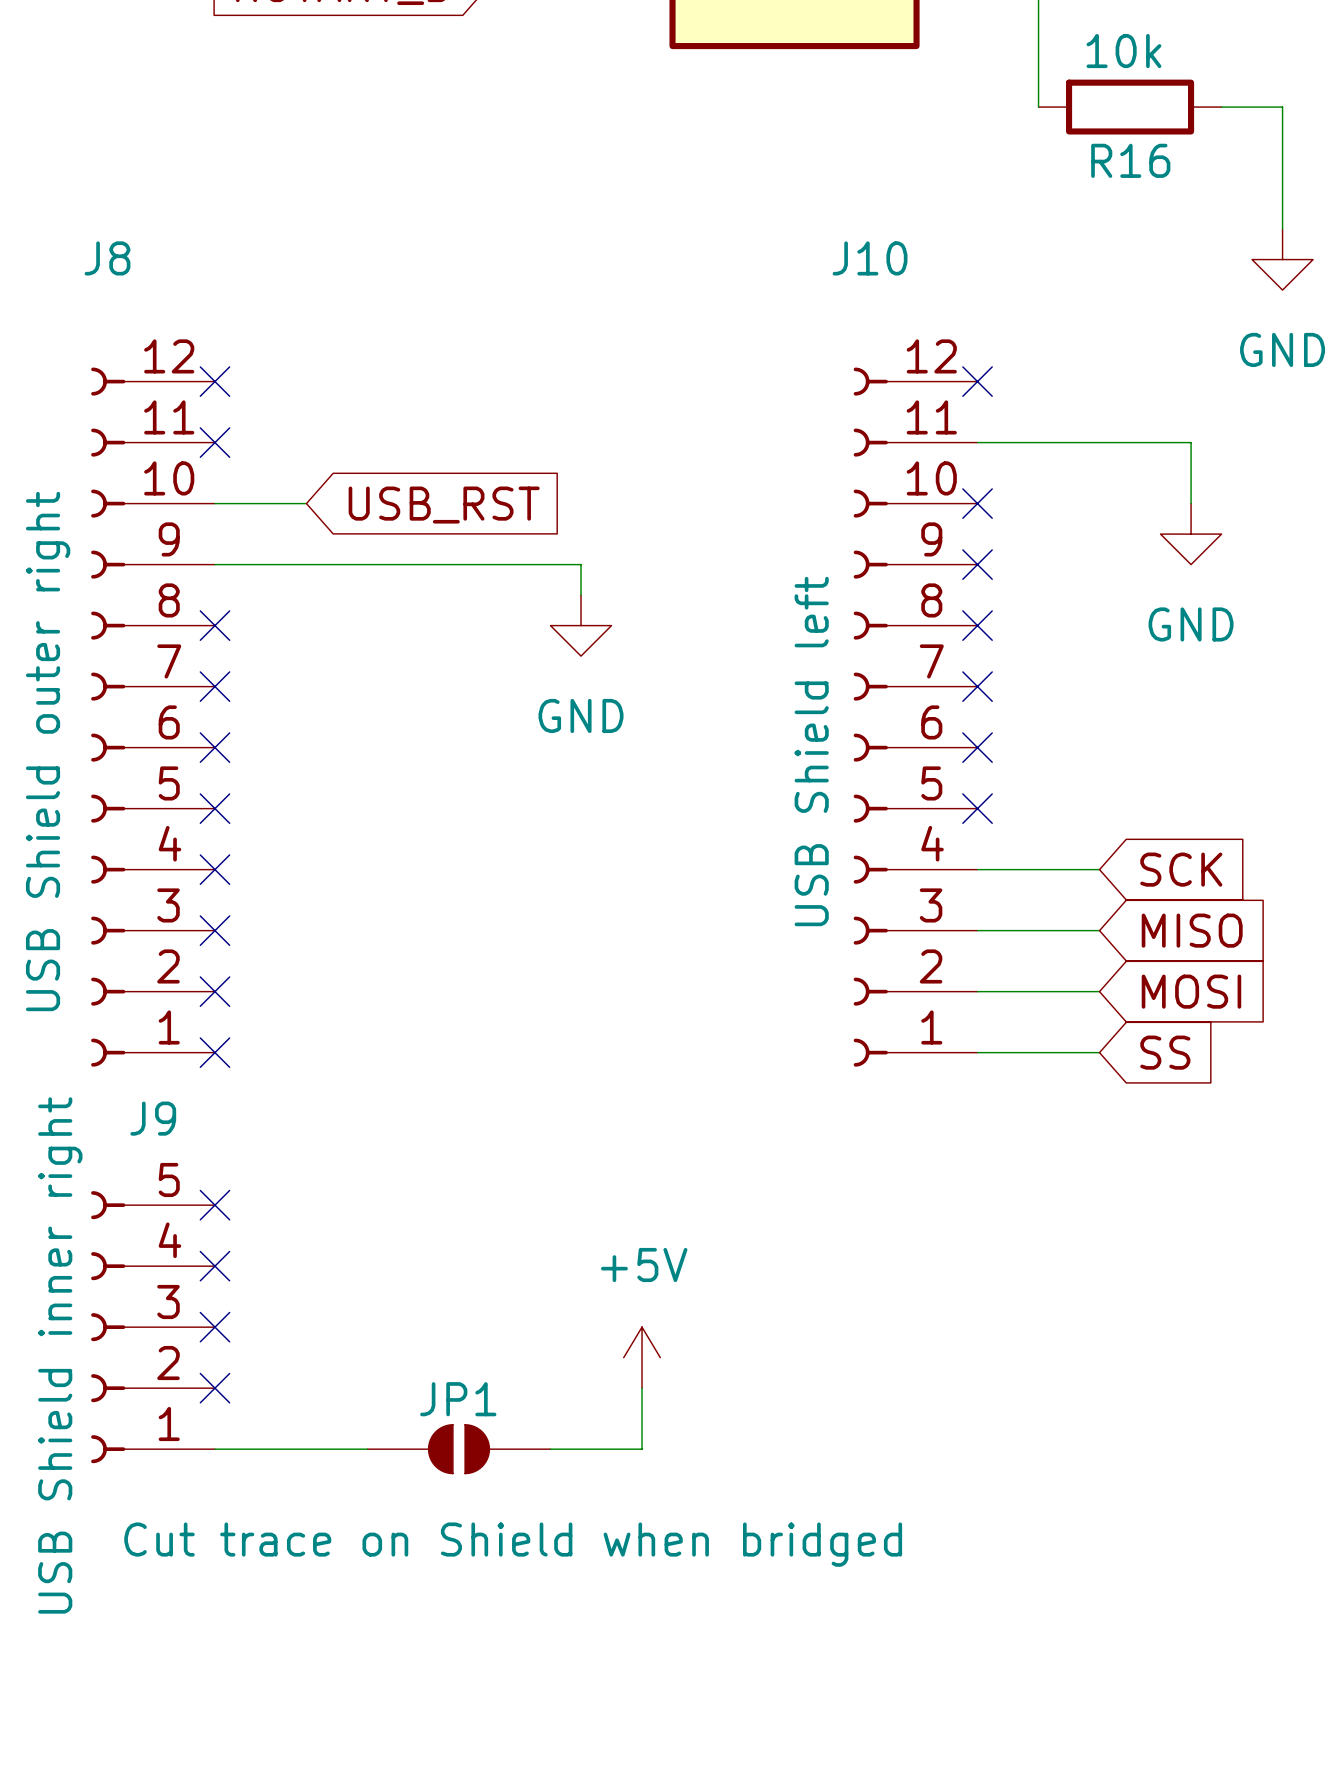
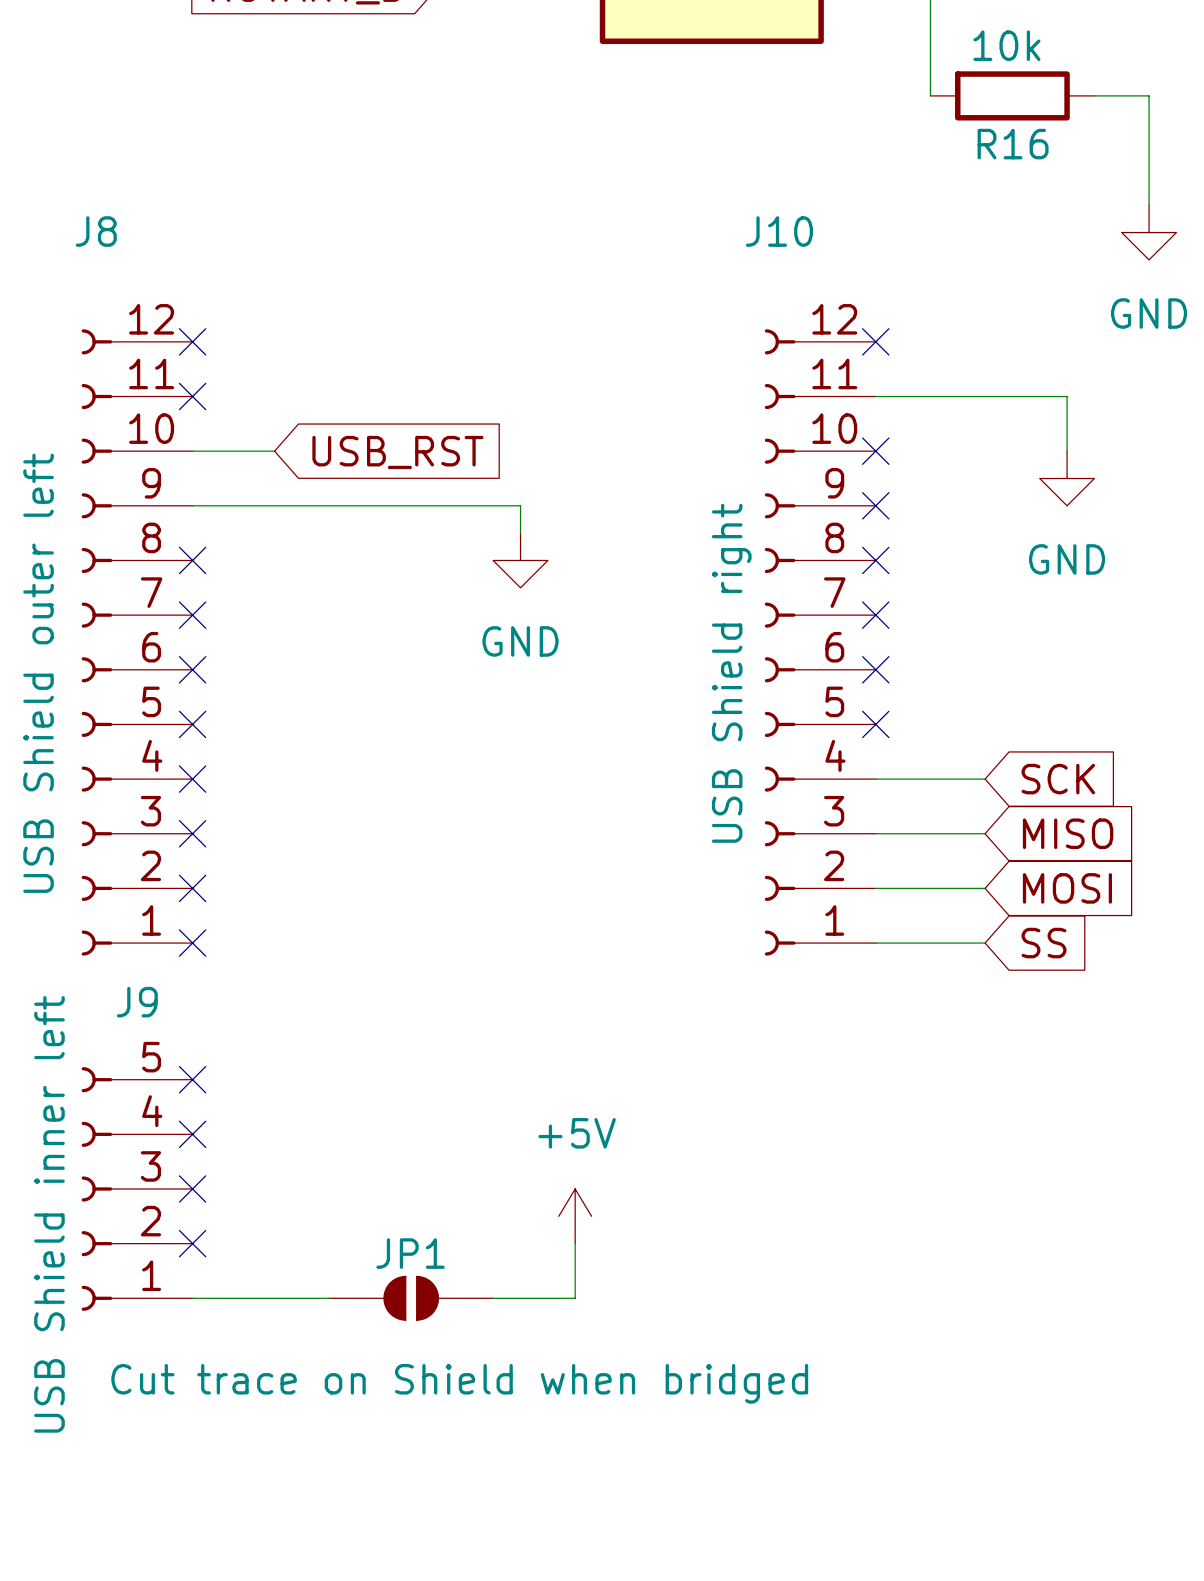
J8 value: USB Shield outer right (48, 751) -> USB Shield outer left (38, 673)
J10 value: USB Shield left (811, 751) -> USB Shield right (731, 673)
J9 value: USB Shield inner right (60, 1355) -> USB Shield inner left (49, 1214)

